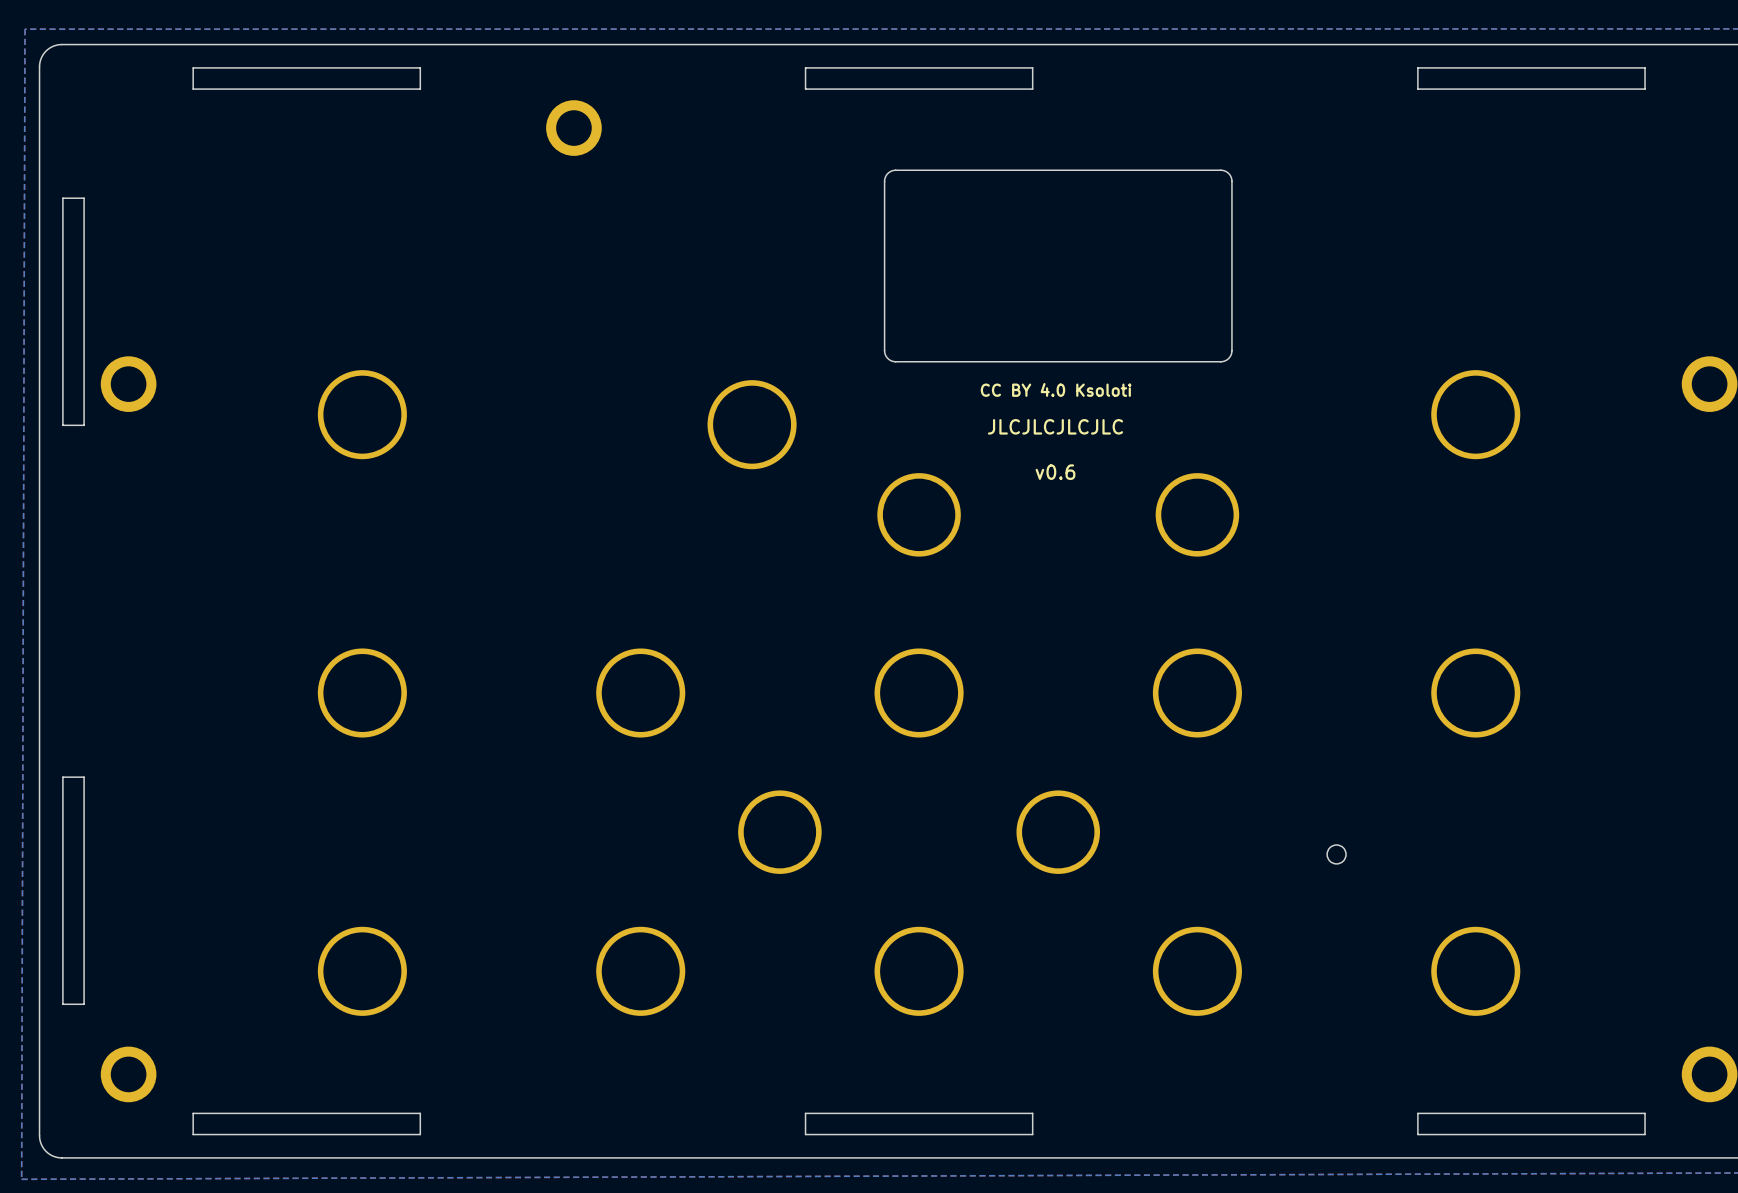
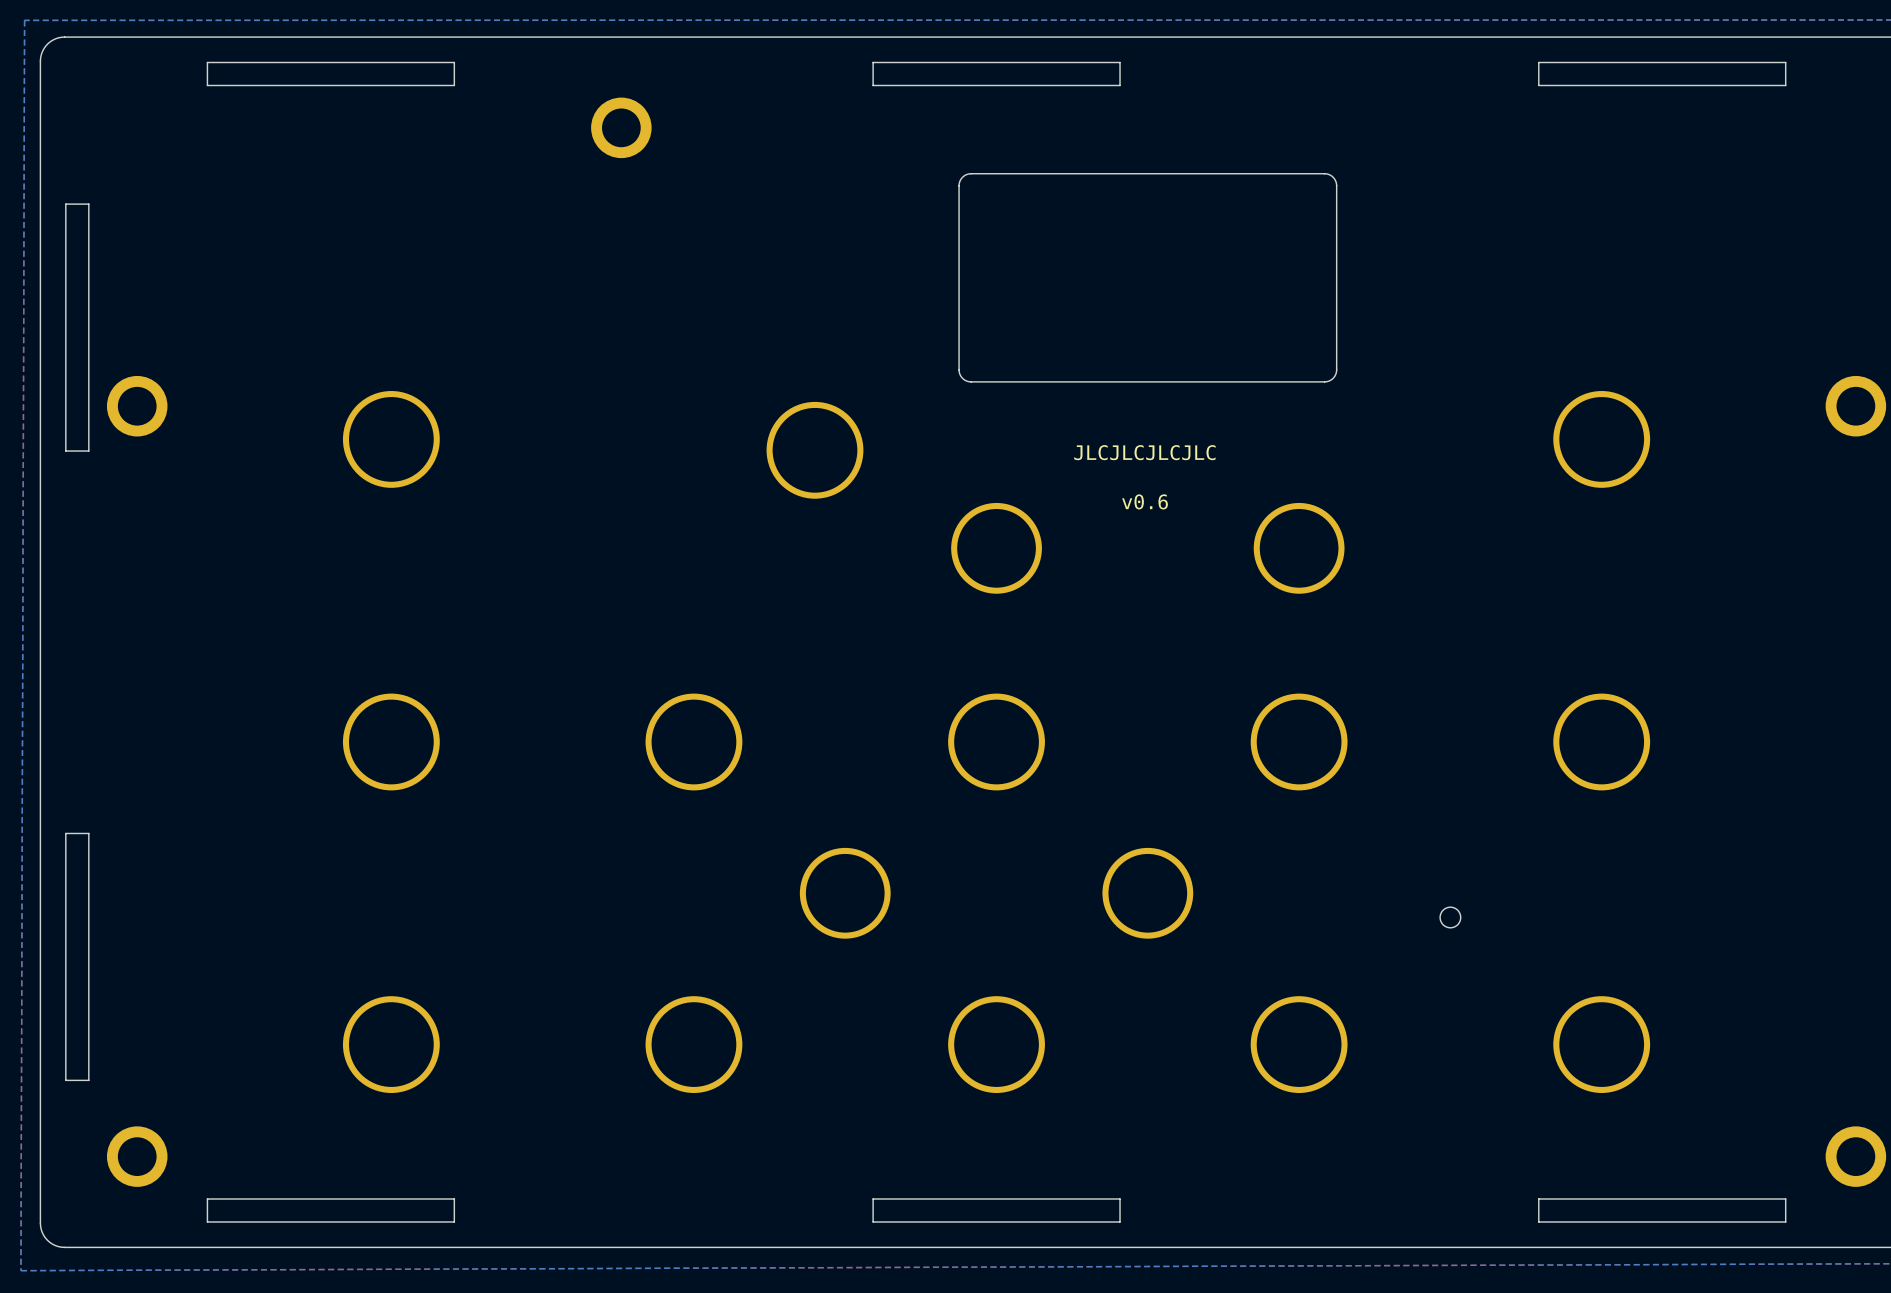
text: CC BY 4.0 Ksoloti (1056, 389) -> none

